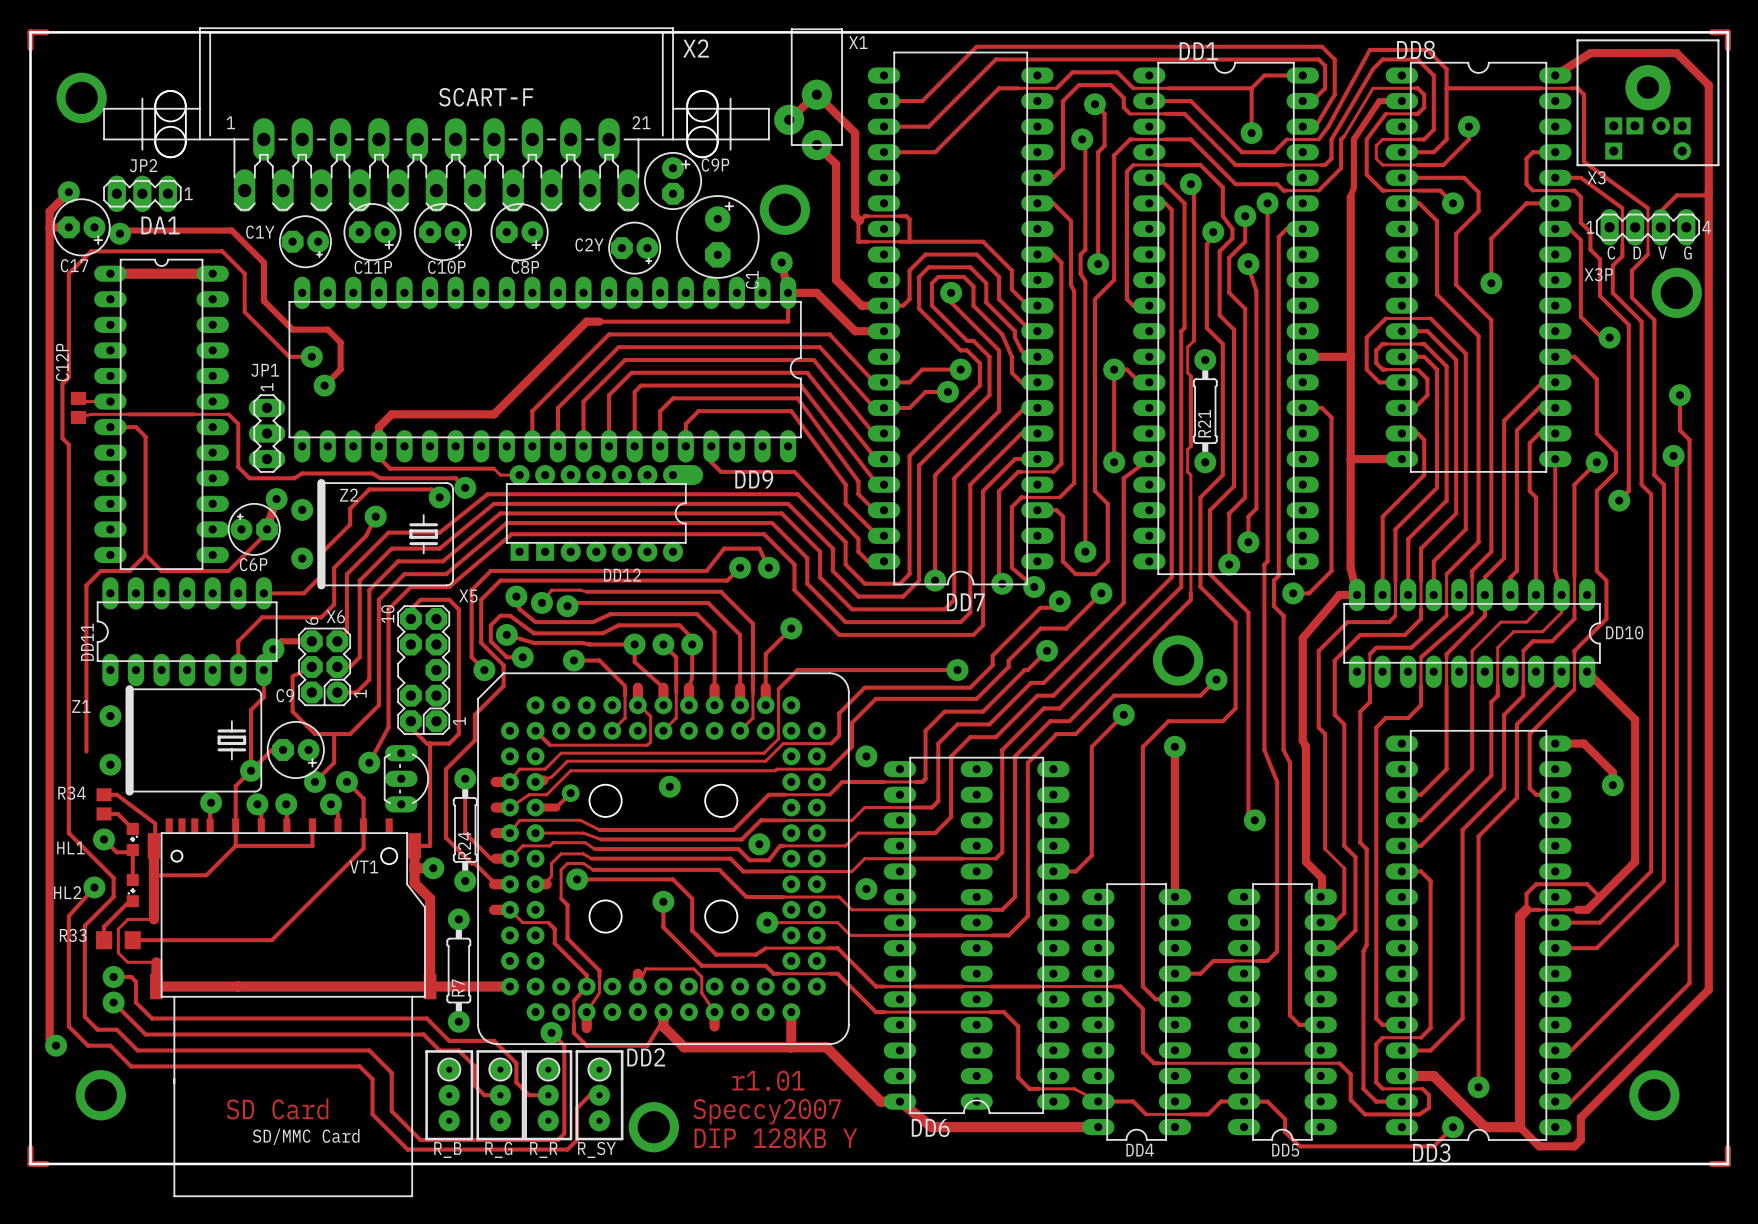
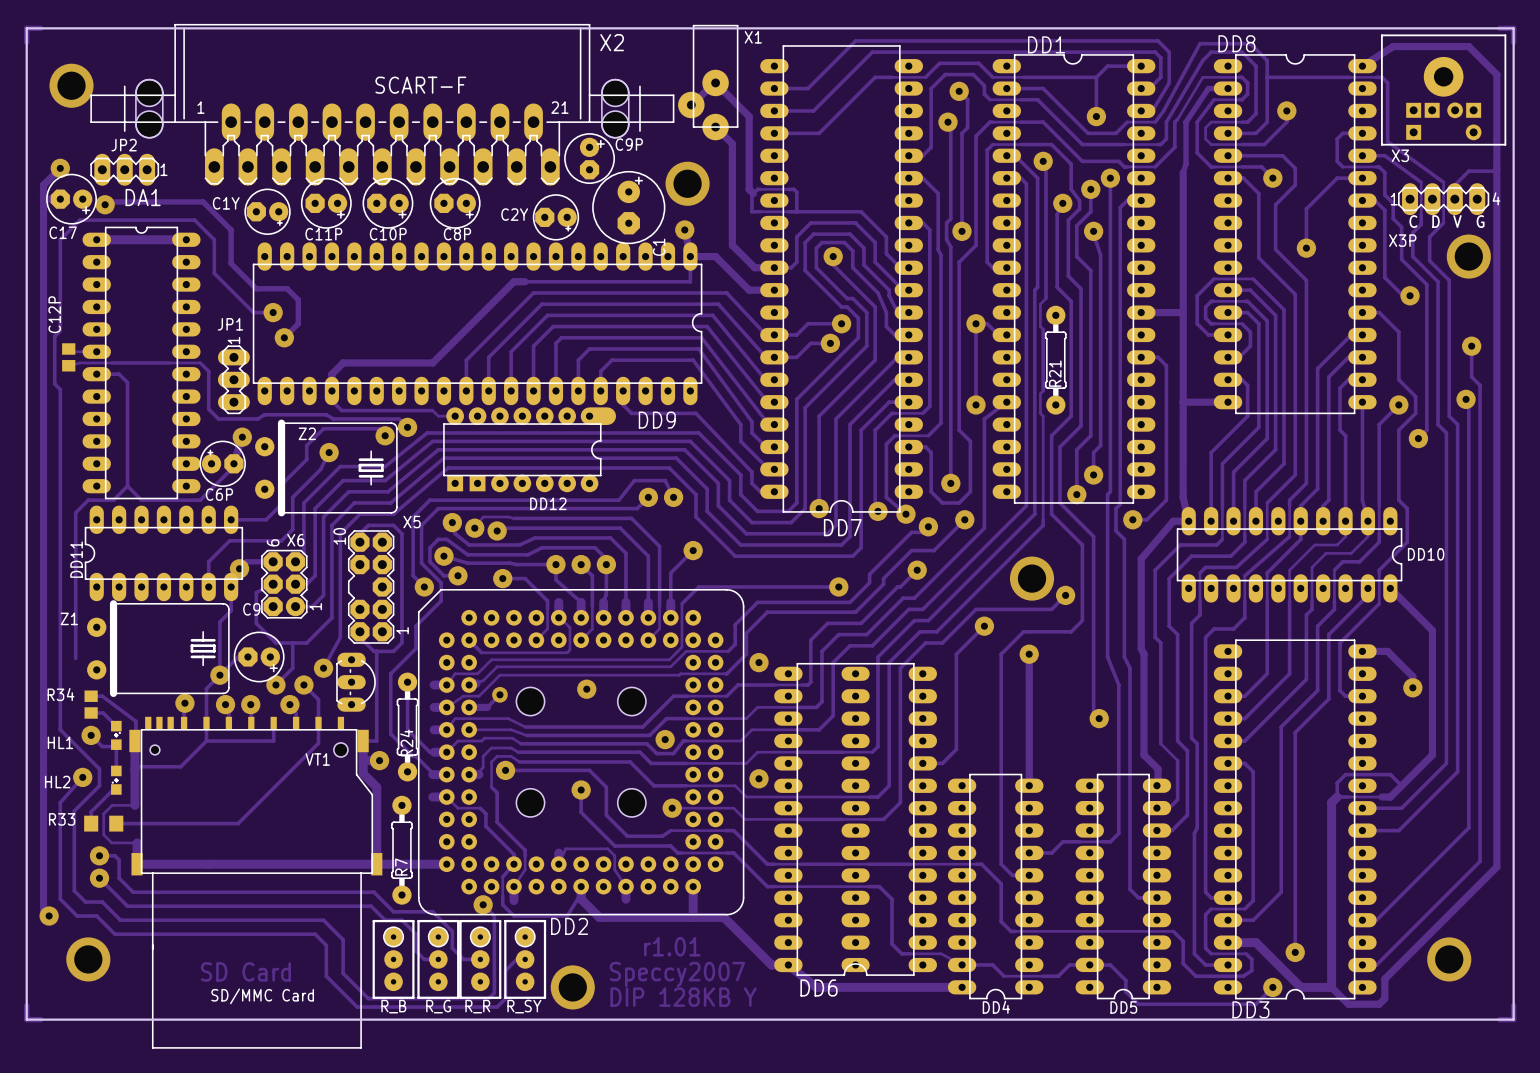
line: (343, 679) (330, 679) (324, 686) (324, 705) -> none
line: (442, 708) (430, 708) (423, 714) (423, 734) -> none

